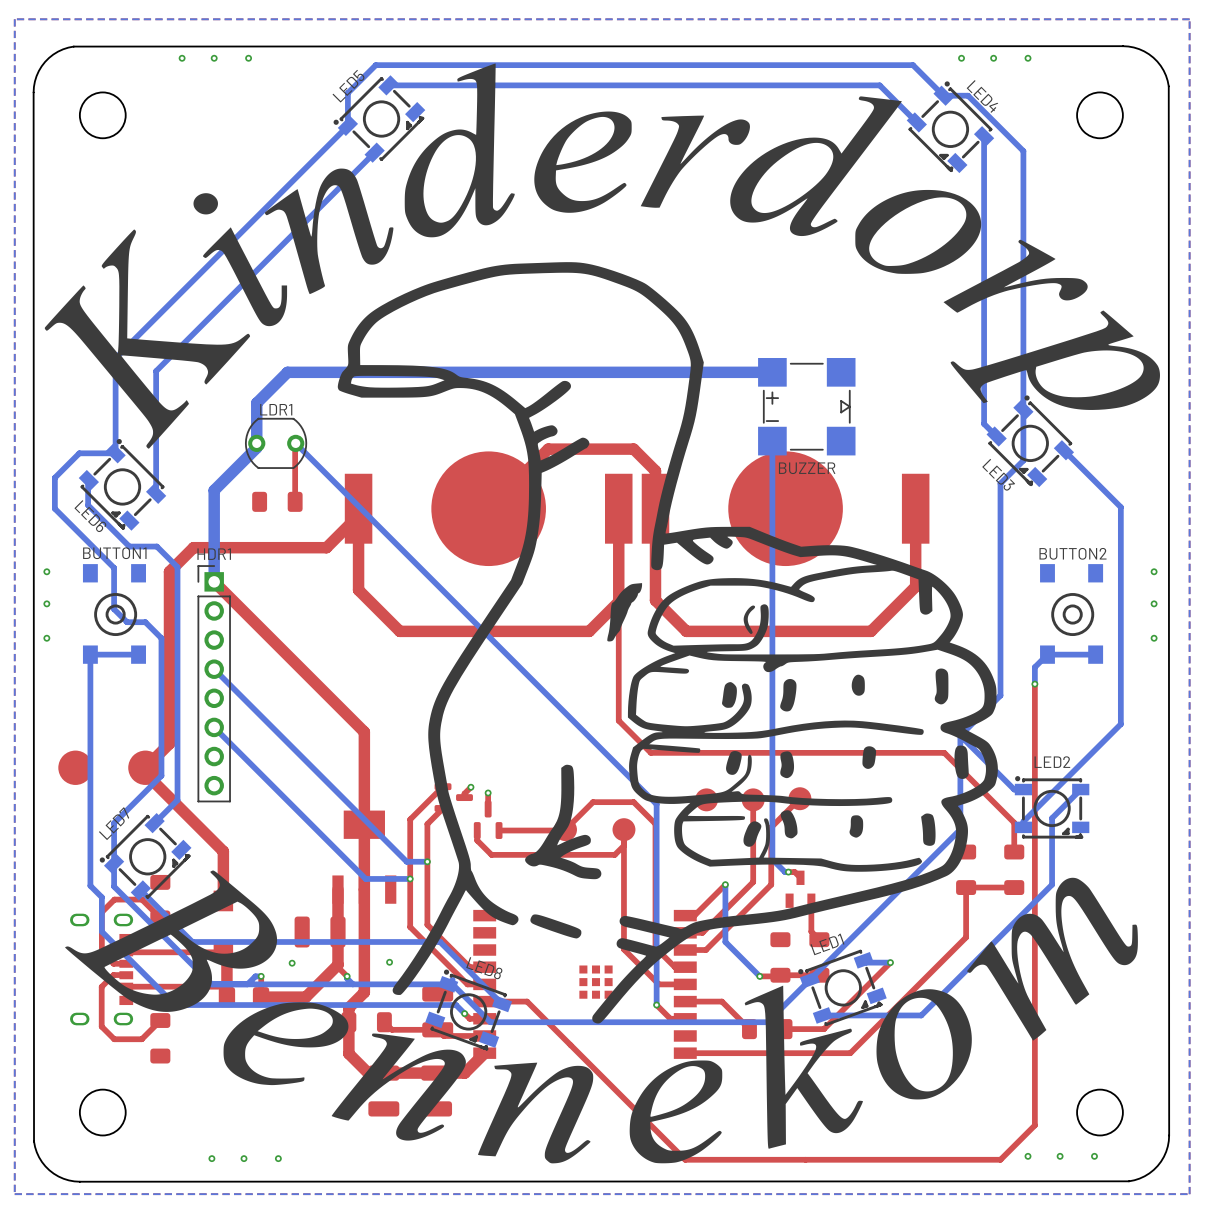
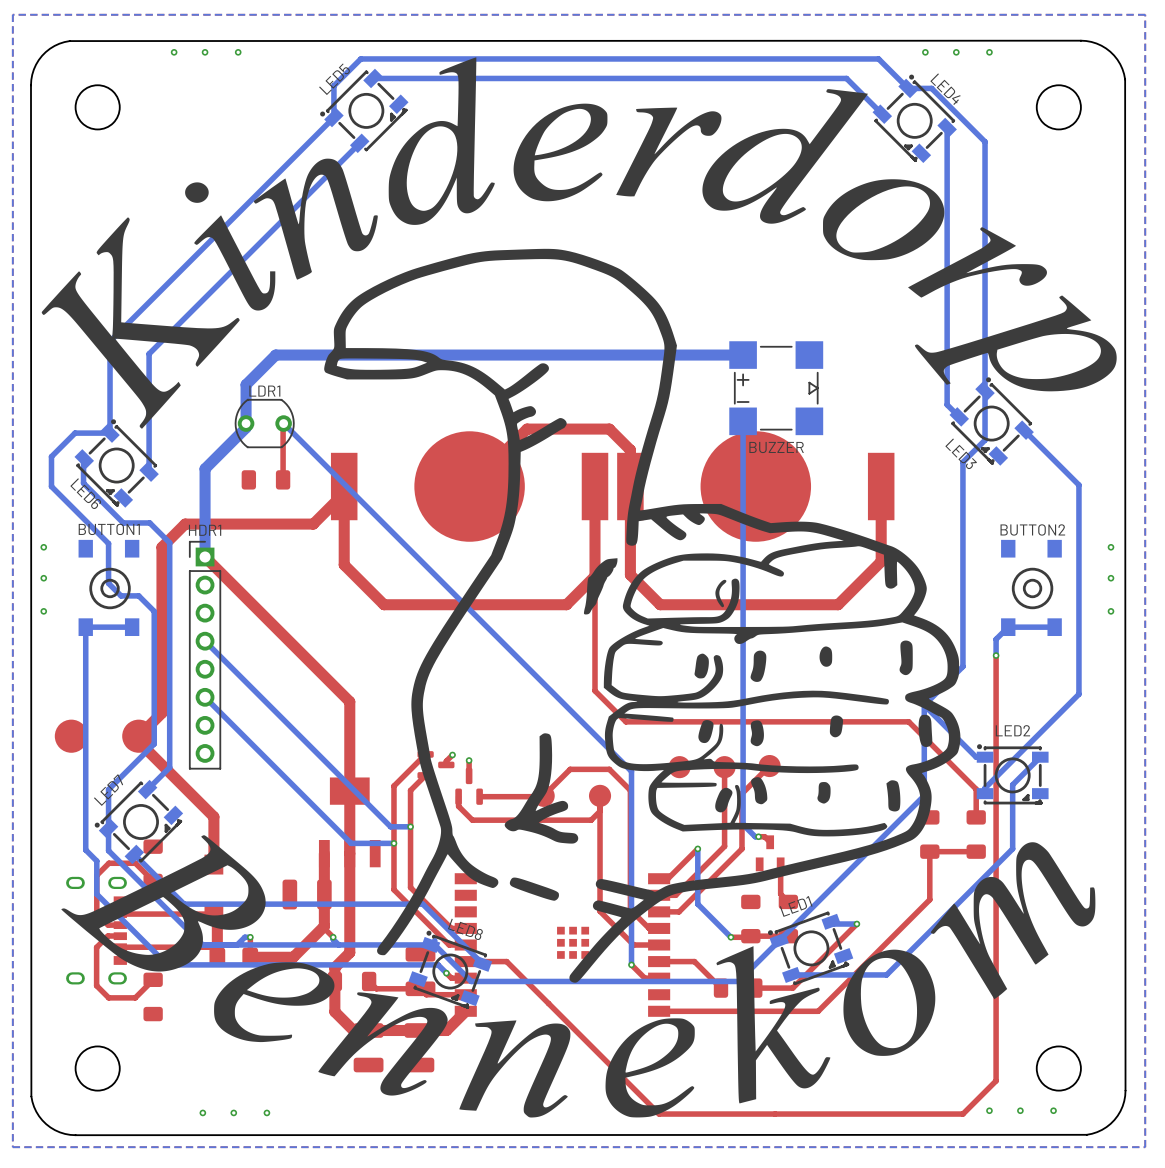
via: (389, 962) -> none
via: (292, 963) -> none

